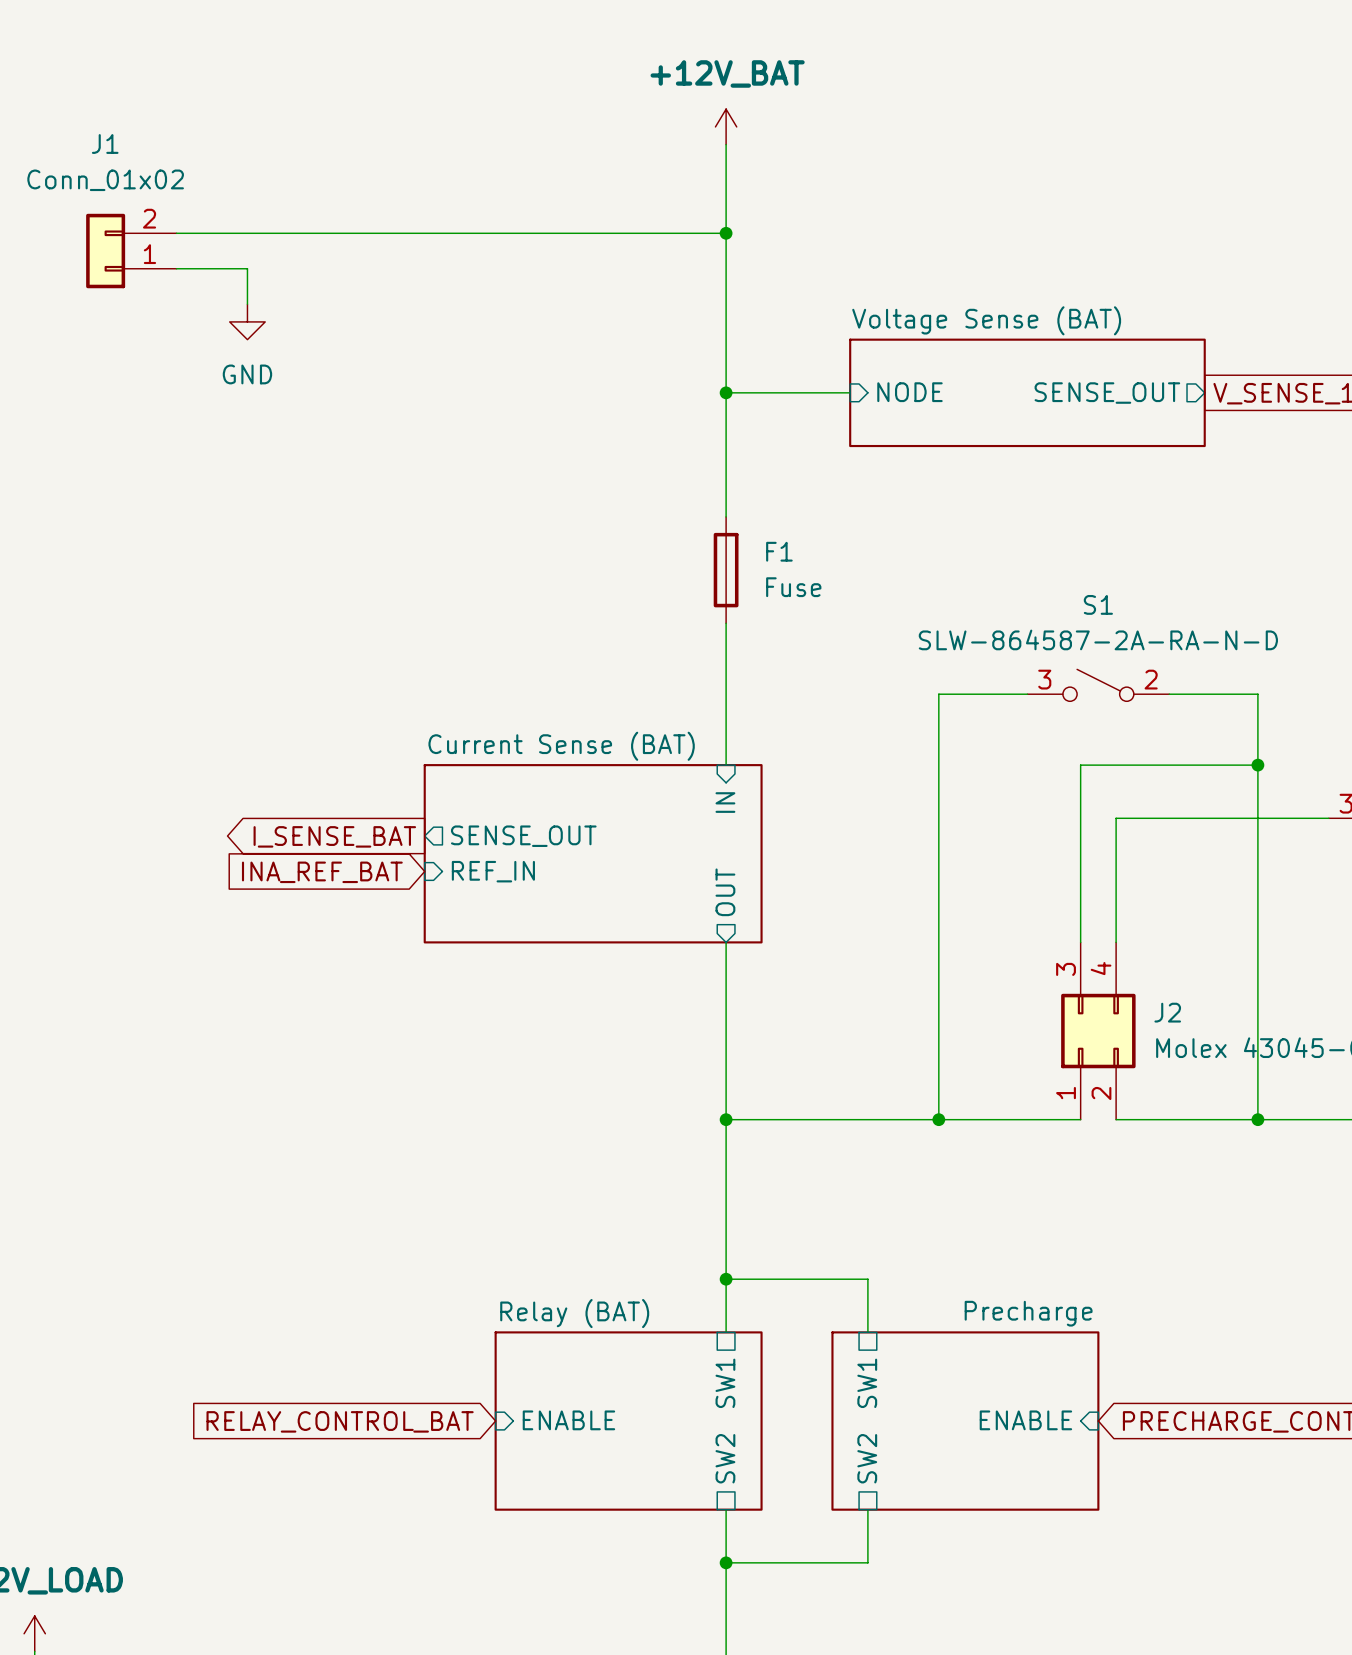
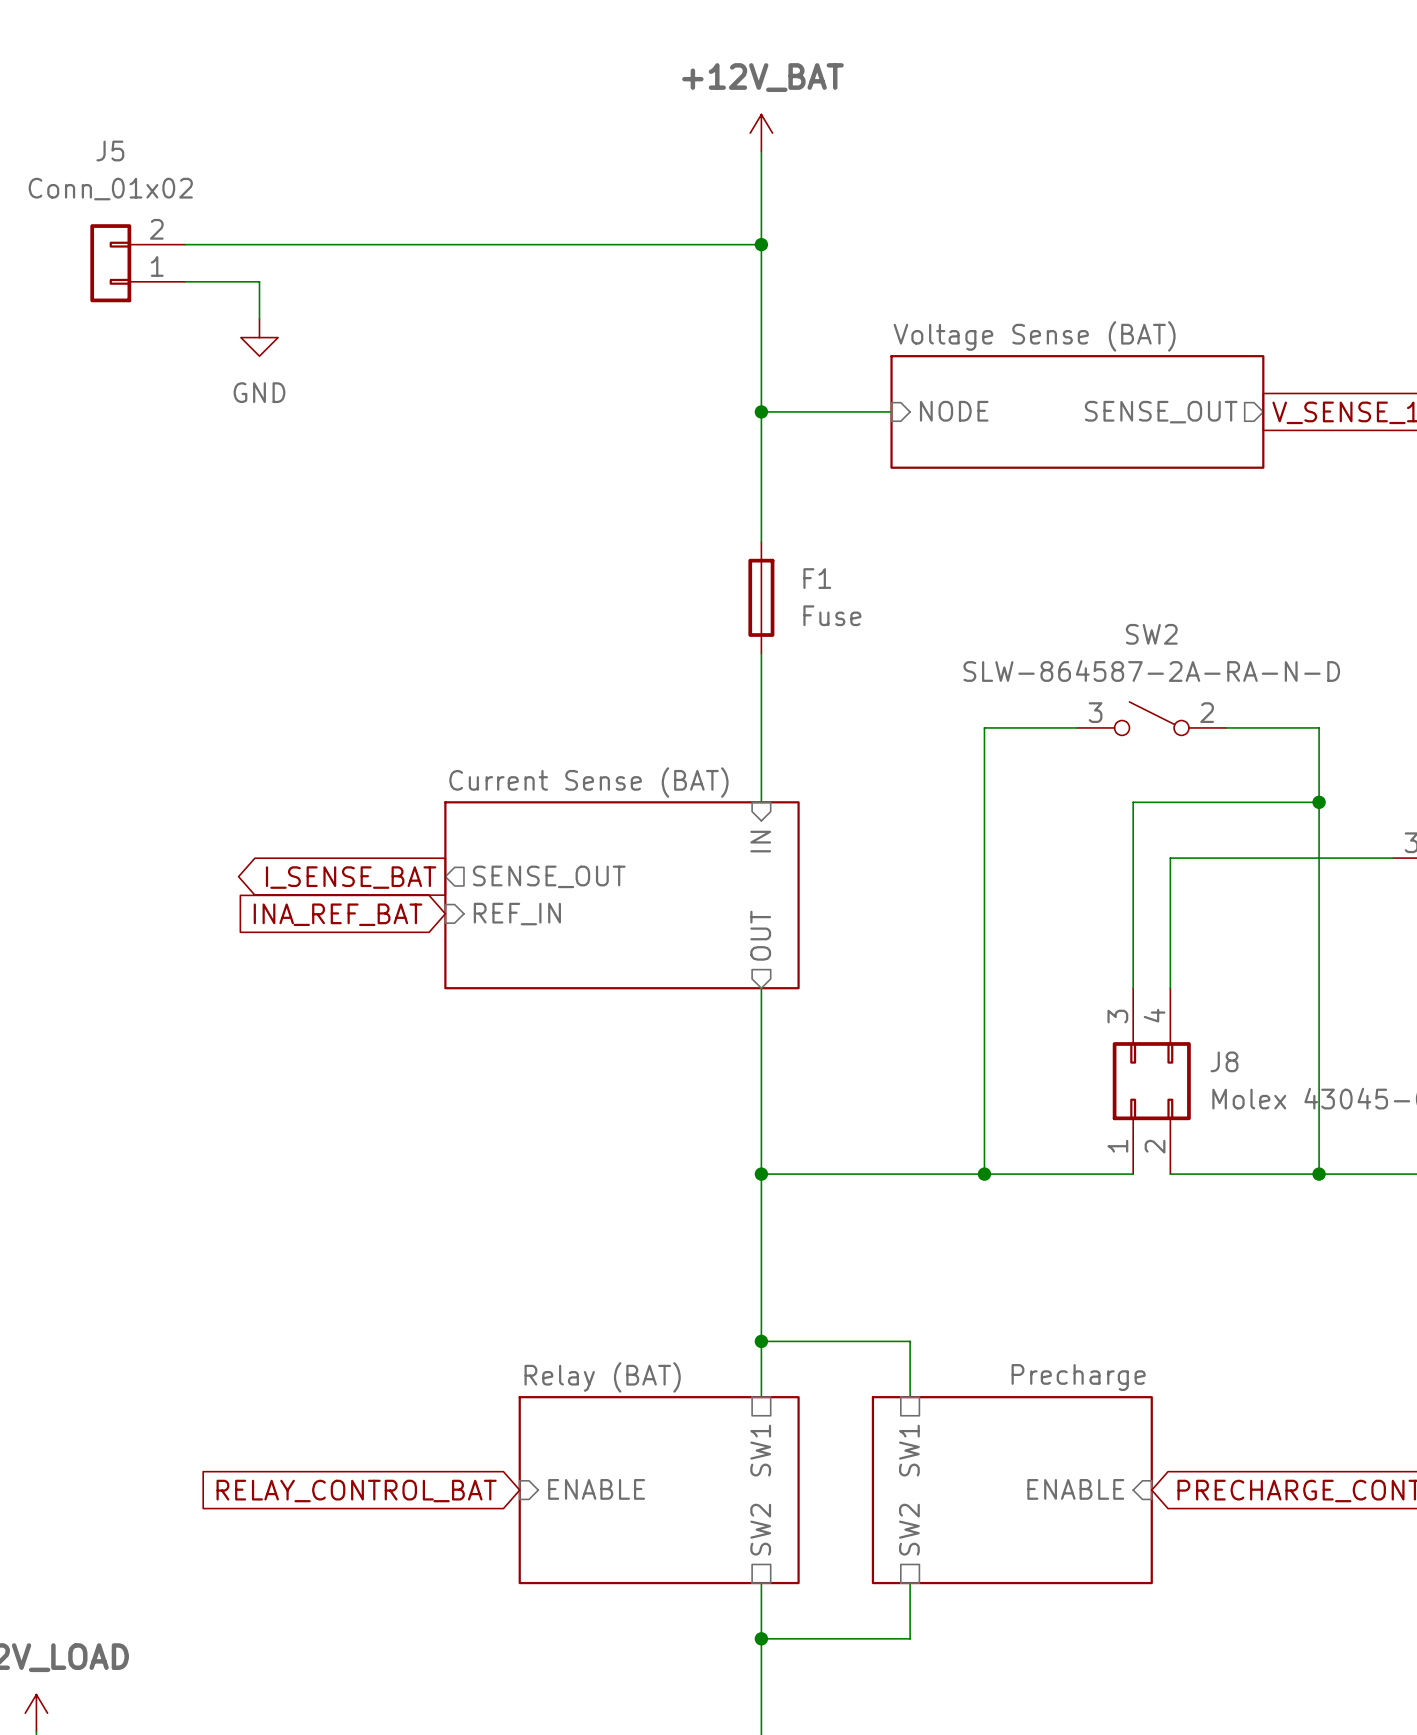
J1 name: J1 (105, 144) -> J5 (110, 151)
S1 name: S1 (1098, 604) -> SW2 (1151, 634)
J2 name: J2 (1167, 1012) -> J8 (1224, 1061)

